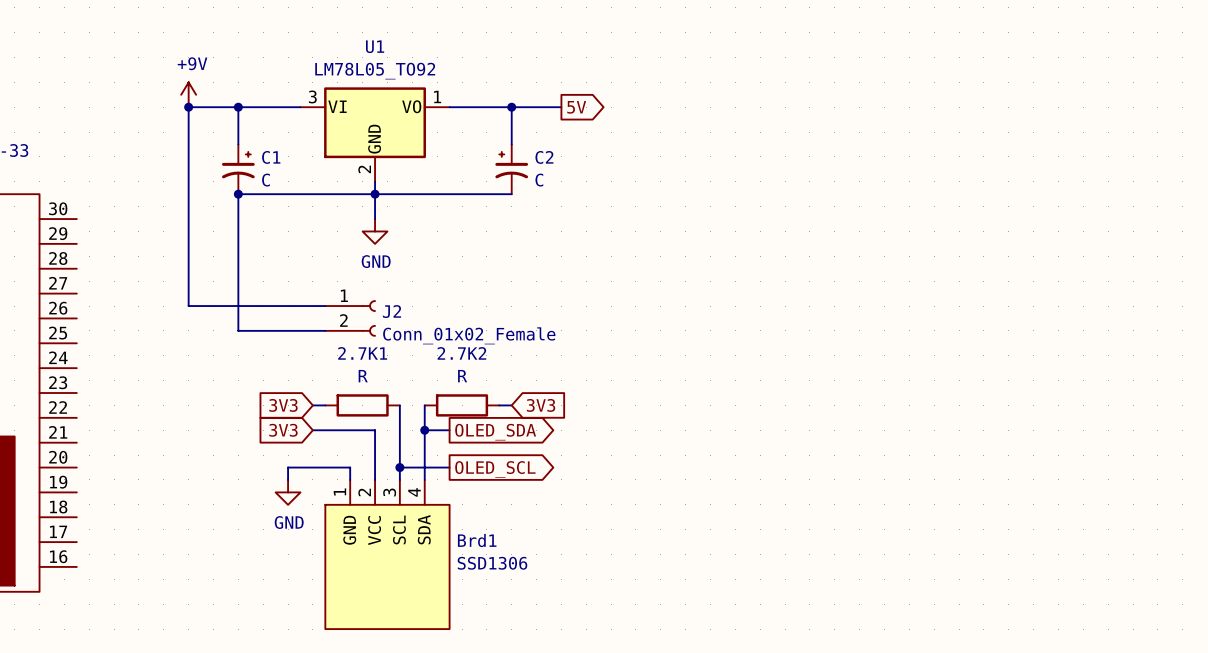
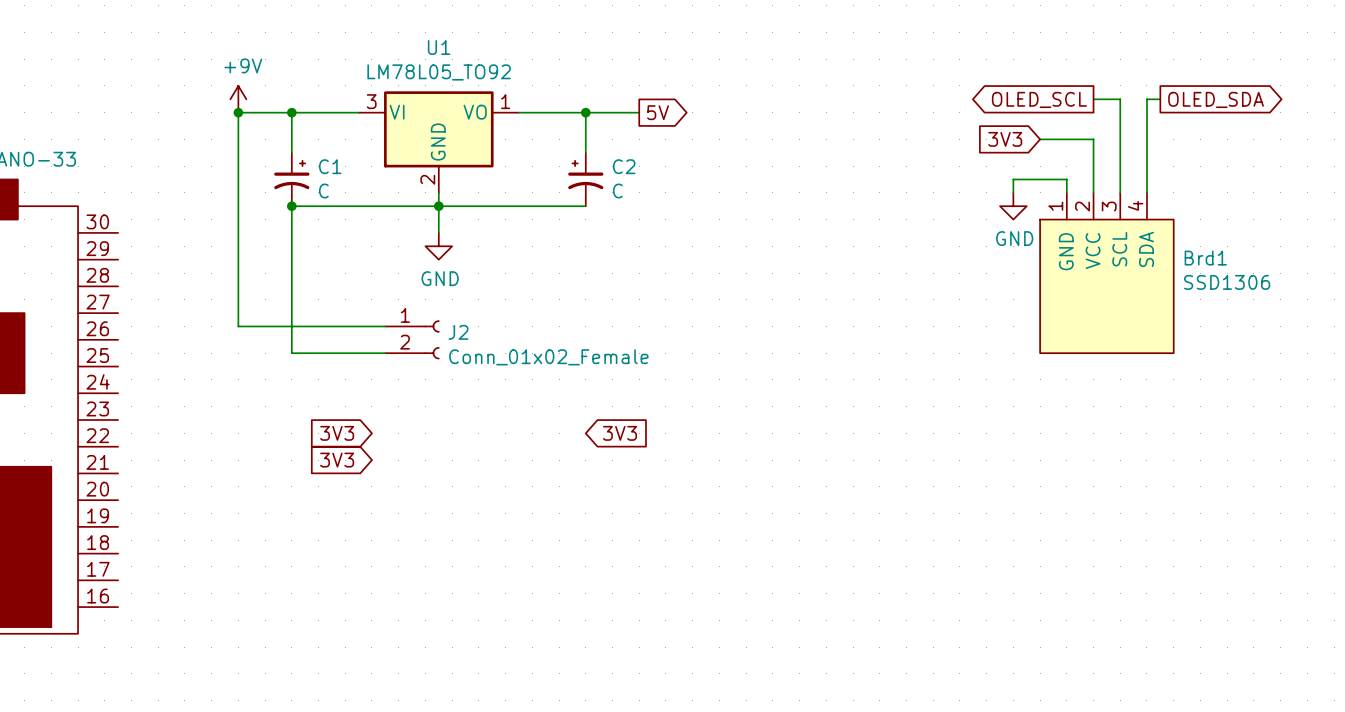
wire: none -> (1093, 99) (1120, 99) (1120, 192)
wire: none -> (1160, 99) (1146, 99) (1146, 192)
global label: none -> OLED_SCL (1039, 99)
global label: none -> OLED_SDA (1216, 99)
global label: none -> 3V3 (1005, 139)
wire: none -> (1040, 139) (1093, 139) (1093, 192)
wire: none -> (1013, 192) (1013, 179) (1066, 179) (1066, 192)
power symbol: none -> GND (1013, 206)
wire: (312, 405) (325, 405) -> none
2.7K1: R (362, 405) -> none
wire: (399, 405) (399, 479) -> none
wire: (424, 405) (424, 479) -> none
2.7K2: R (462, 405) -> none
wire: (499, 405) (511, 405) -> none
wire: (312, 430) (375, 430) (375, 479) -> none
wire: (424, 430) (449, 430) -> none
junction: (424, 430) -> none
global label: OLED_SDA (495, 432) -> none
wire: (399, 467) (449, 467) -> none
junction: (399, 467) -> none
global label: OLED_SCL (495, 469) -> none
wire: (288, 479) (288, 467) (350, 467) (350, 479) -> none
power symbol: GND (288, 492) -> none
Brd1 position: (387, 554) -> (1106, 273)

